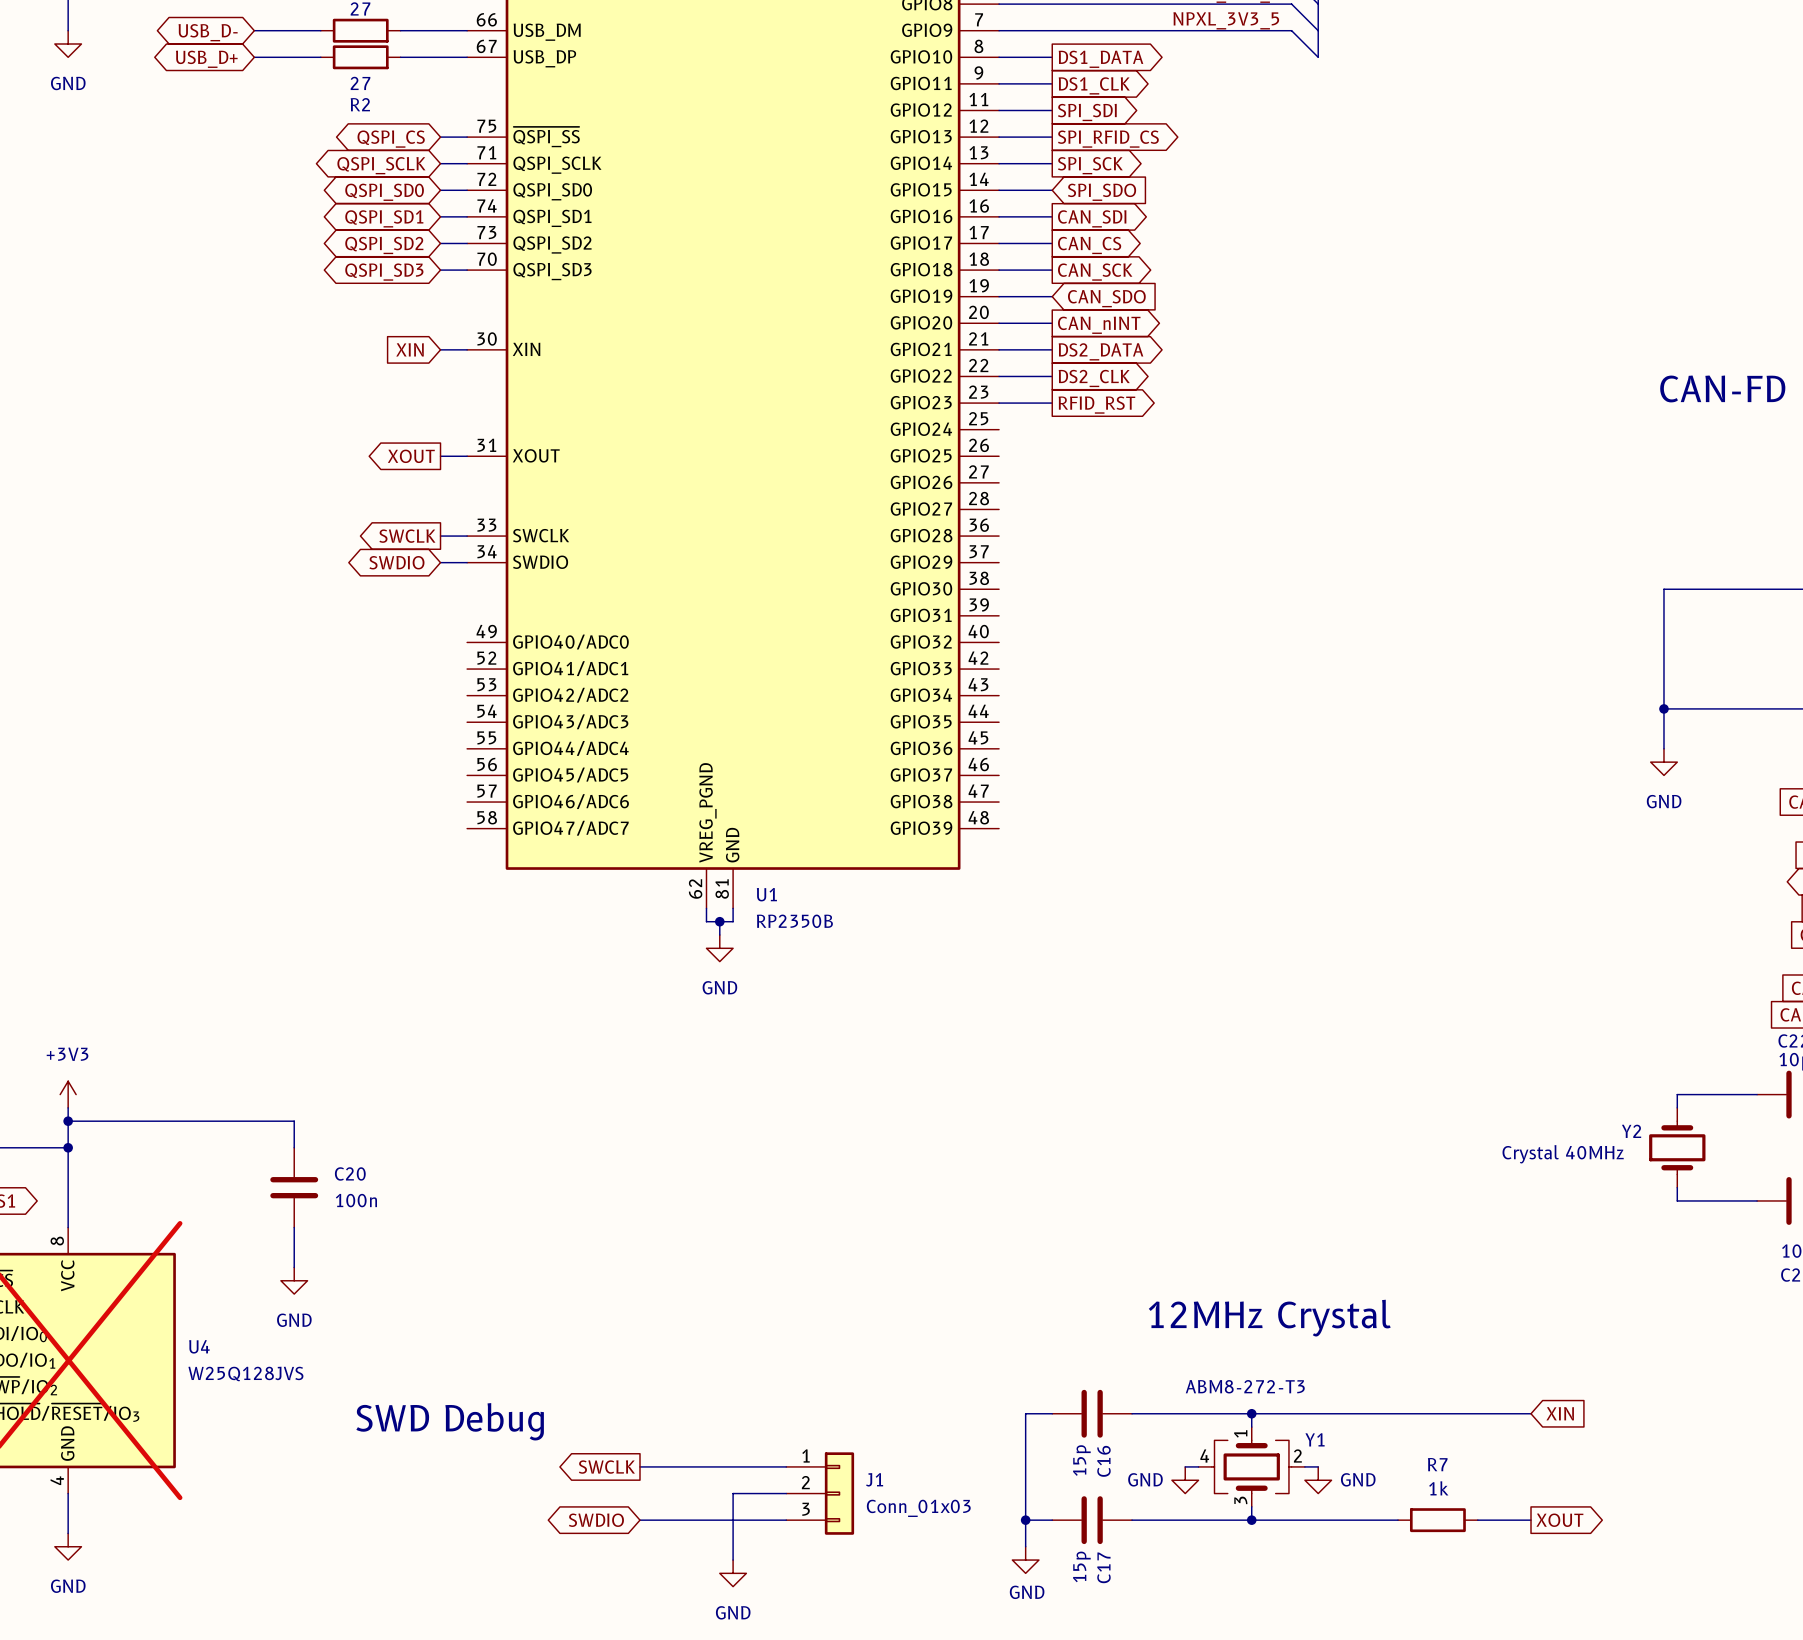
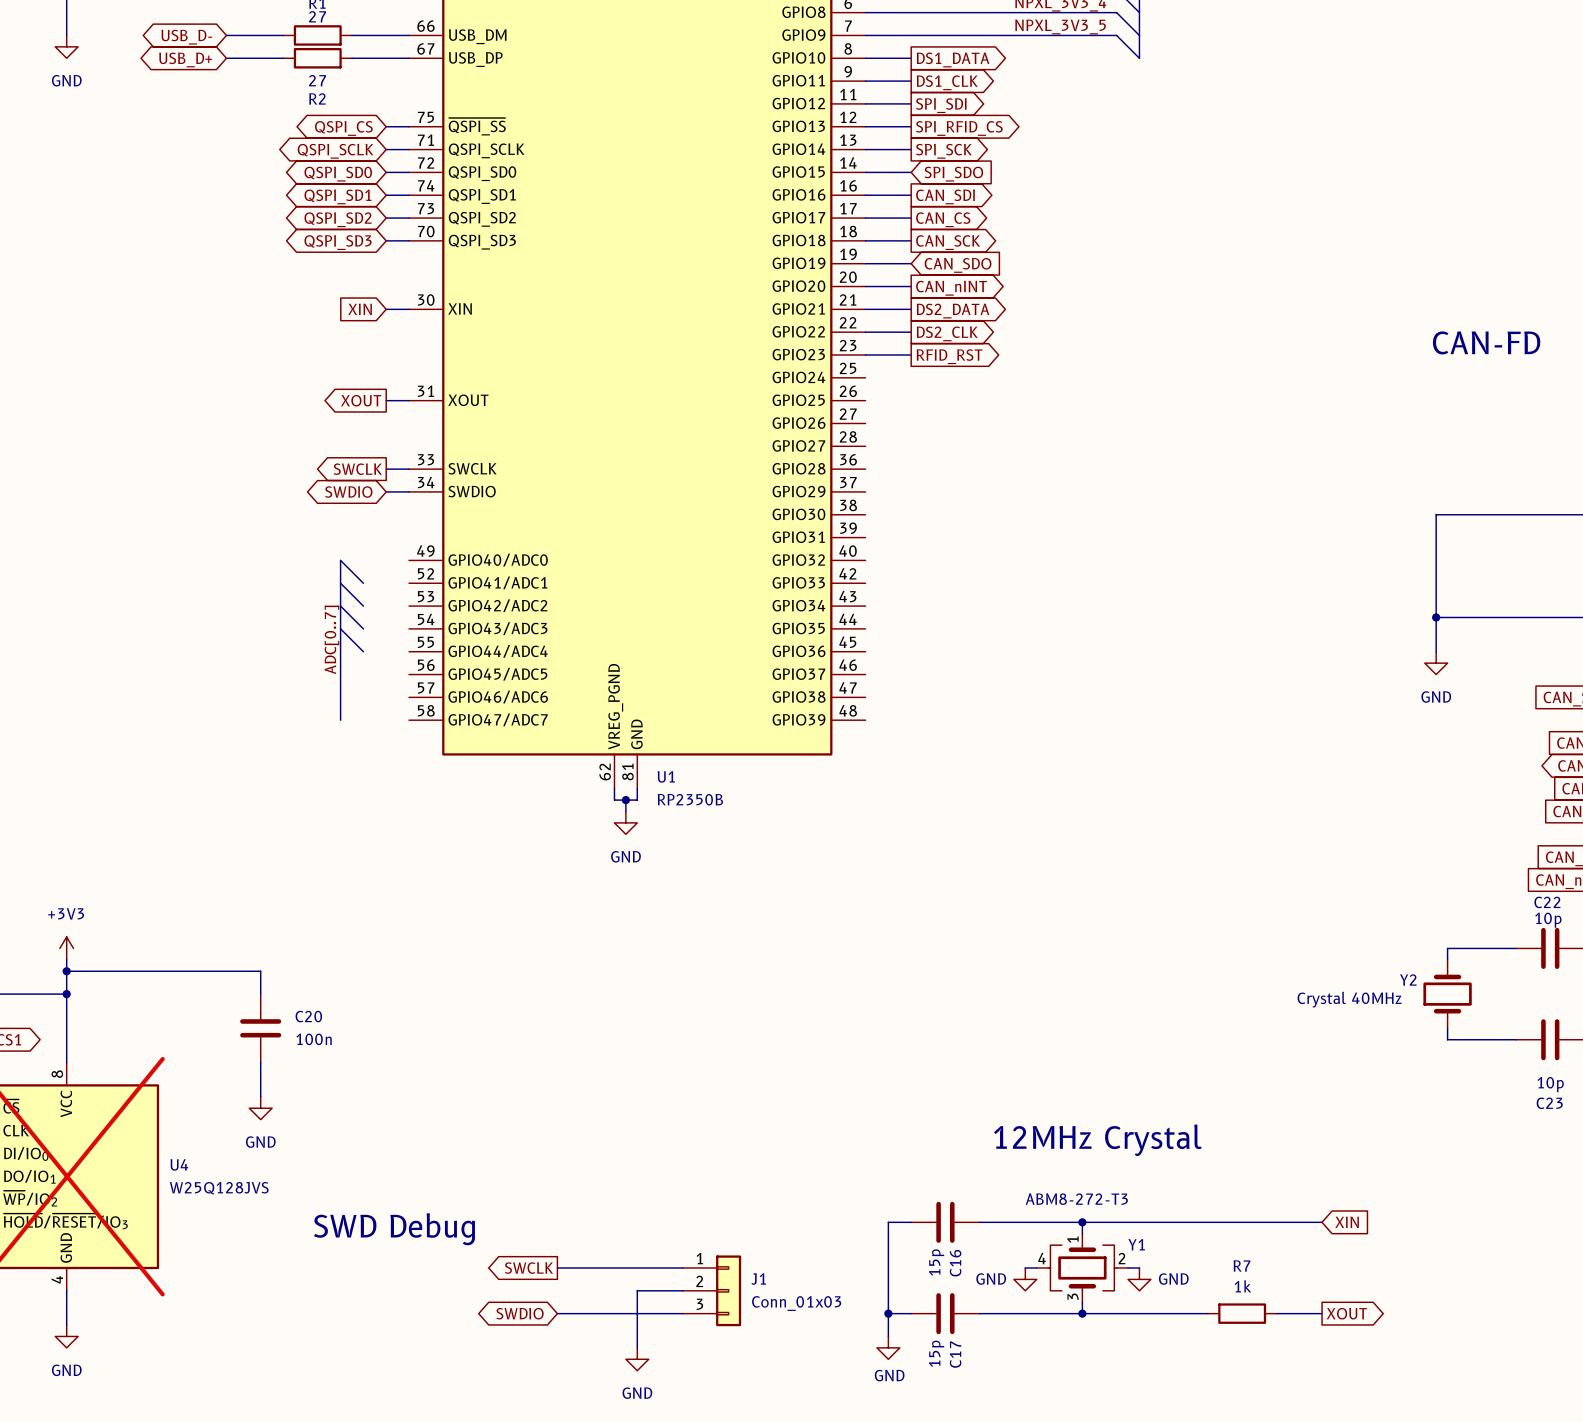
wire: none -> (340, 560) (363, 583)
bus: none -> (340, 560) (340, 720)
wire: none -> (340, 583) (363, 606)
wire: none -> (340, 606) (363, 628)
wire: none -> (340, 628) (363, 651)
label: none -> ADC[0..7] (331, 639)

